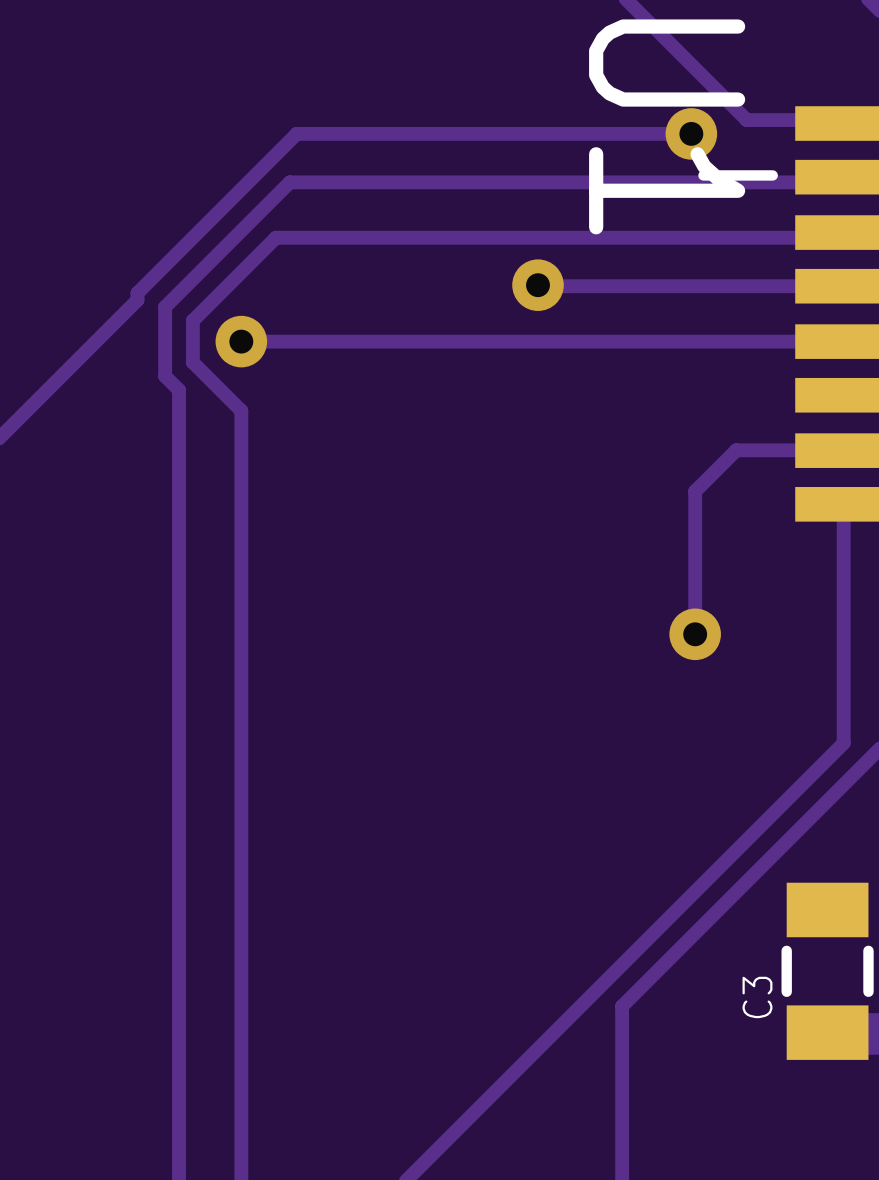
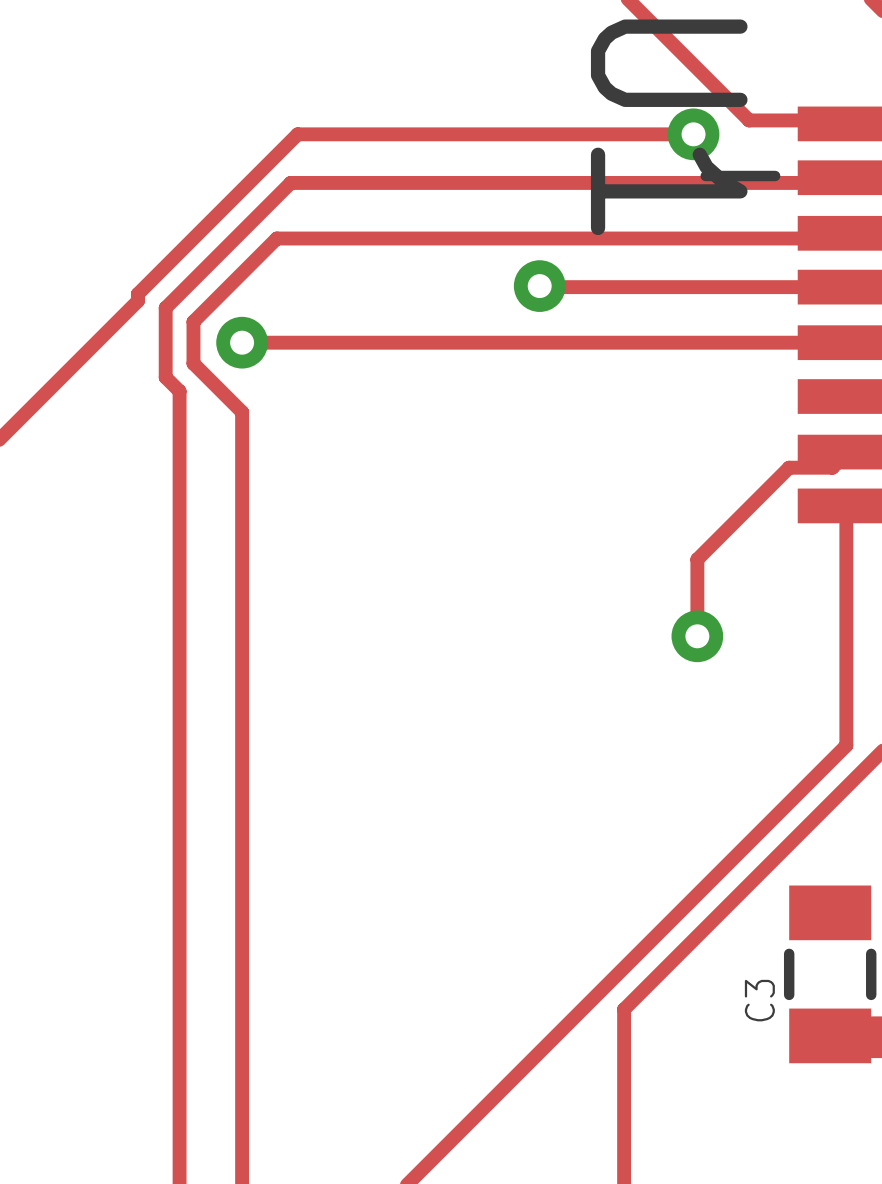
track: (845, 450) (736, 450) (695, 491) (695, 557) -> (848, 452) (832, 467) (789, 467) (697, 559)

